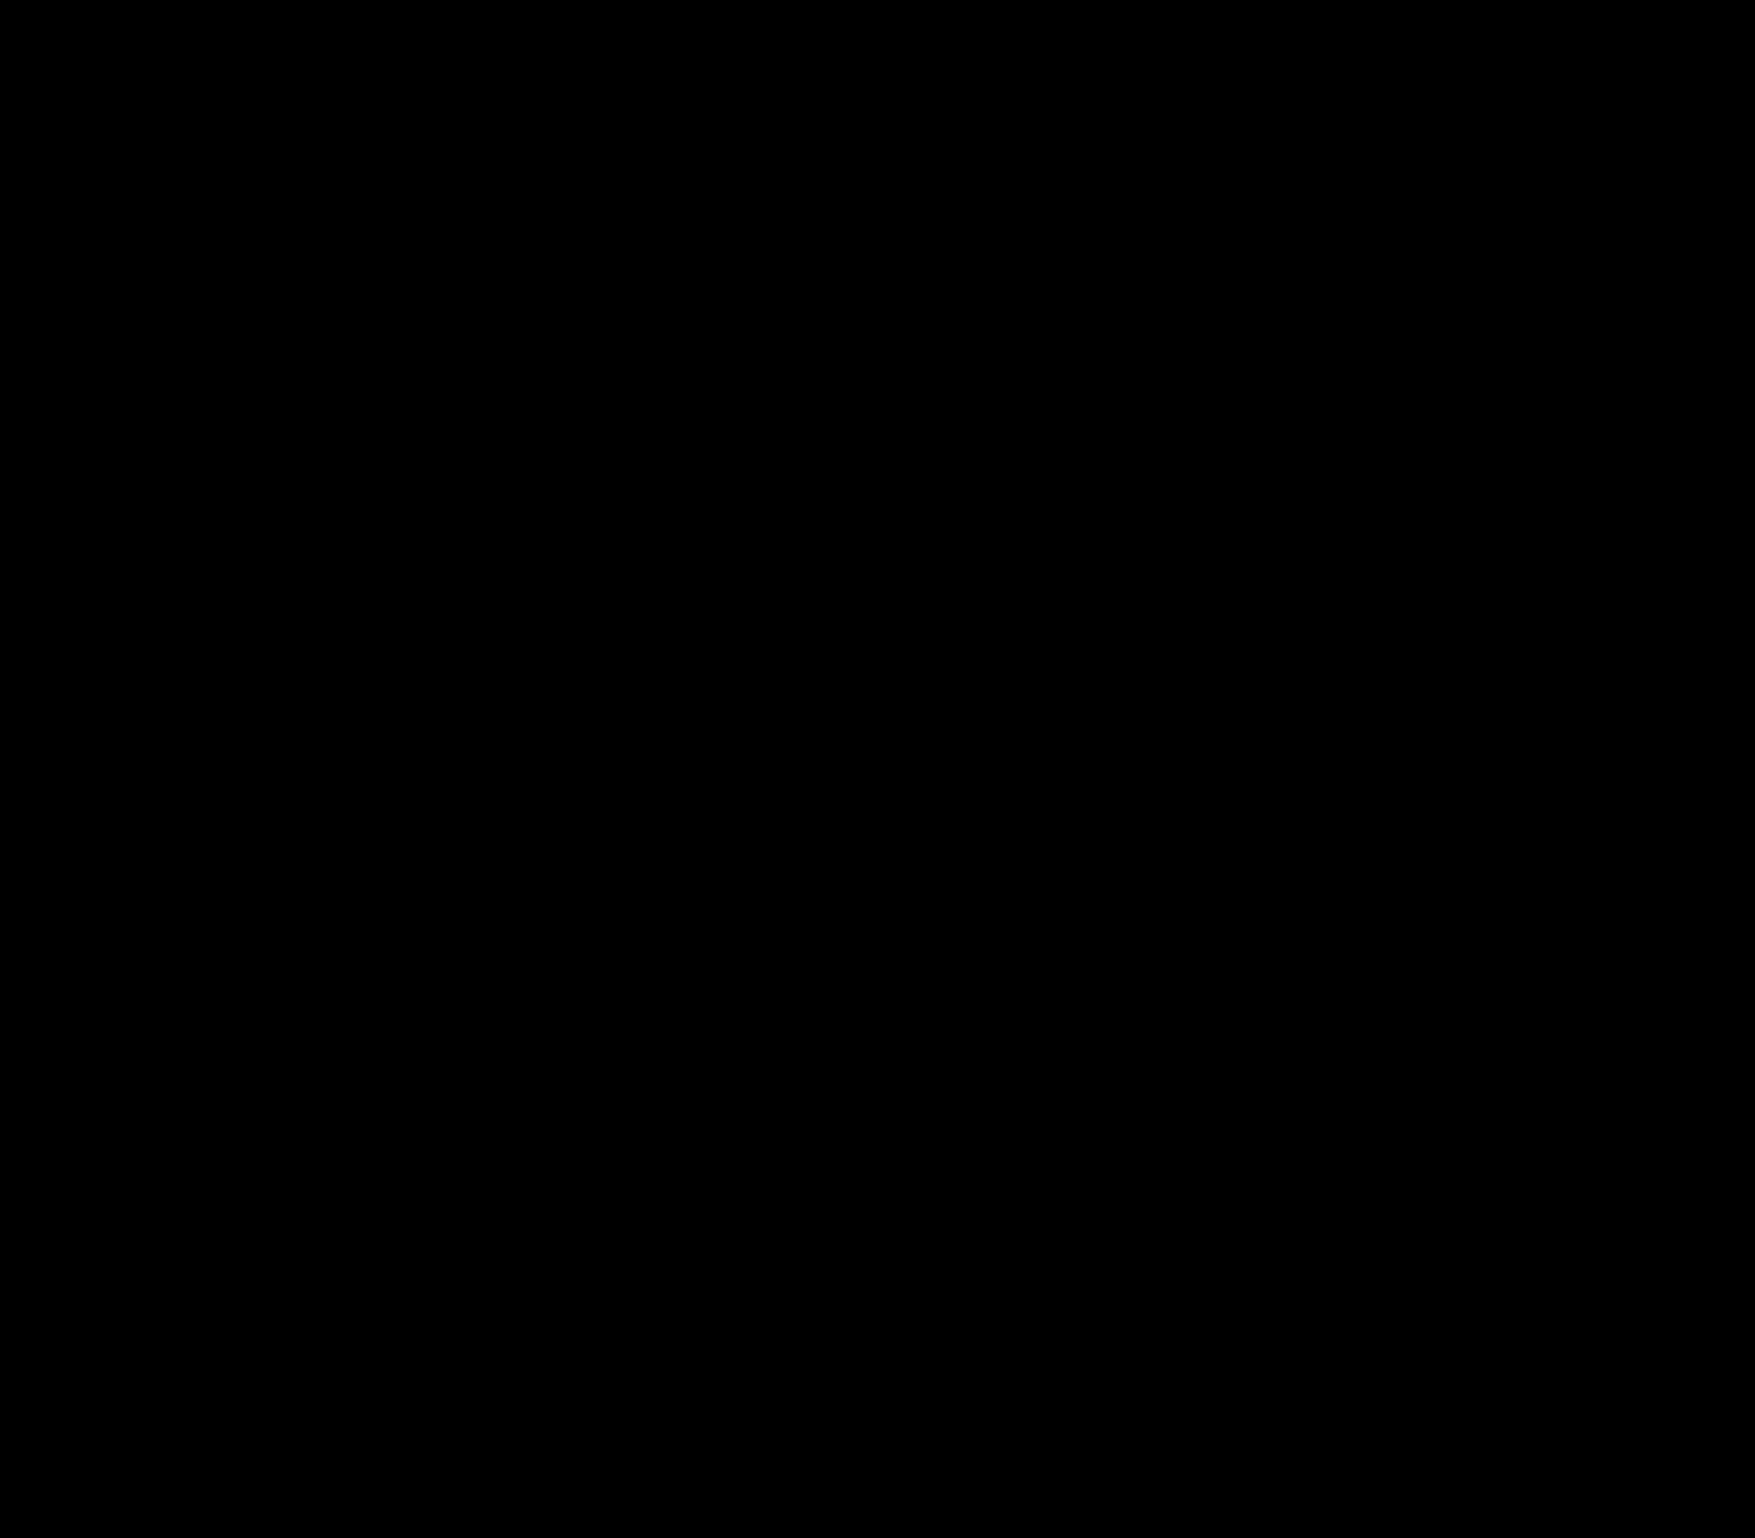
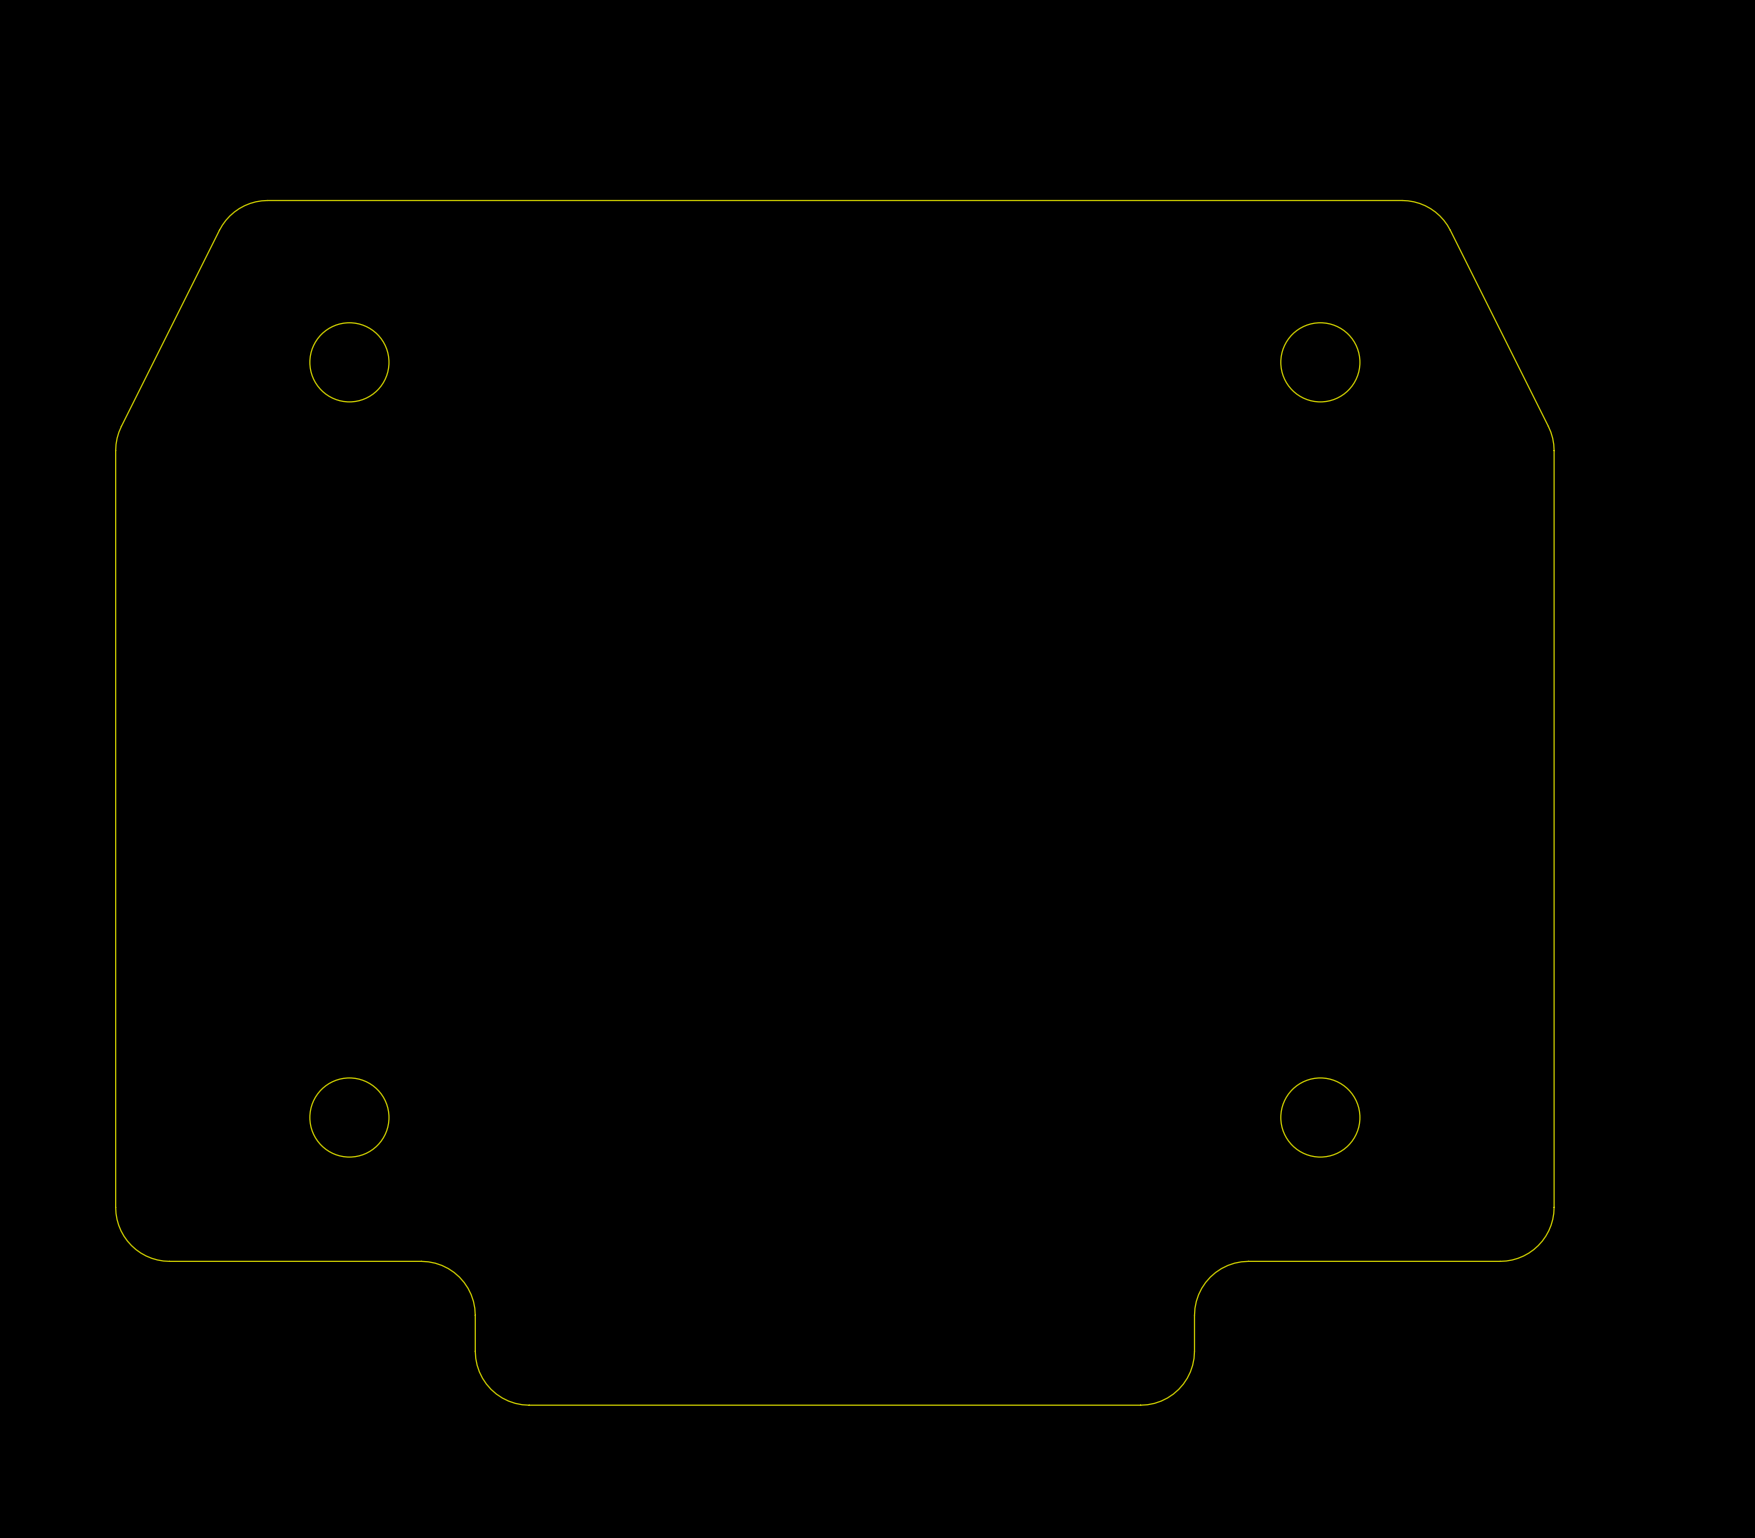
board edge: none -> (267, 200) (1402, 200) (1419, 203) (1435, 211) (1450, 230) (1548, 426) (1553, 444) (1554, 1207) (1551, 1225) (1542, 1241) (1523, 1256) (1506, 1261) (1248, 1261) (1227, 1265) (1210, 1277) (1198, 1294) (1194, 1308) (1194, 1358) (1187, 1378) (1178, 1389) (1167, 1397) (1154, 1403) (1140, 1405) (522, 1404) (508, 1401) (496, 1394) (482, 1378) (475, 1358) (474, 1308) (471, 1294) (459, 1277) (441, 1265) (421, 1261) (169, 1261) (151, 1258) (135, 1249) (121, 1230) (115, 1207) (116, 444) (121, 426) (222, 225) (229, 215) (244, 205) (267, 200)
round board edge: none -> [309, 322, 390, 403]
round board edge: none -> [1280, 322, 1361, 403]
round board edge: none -> [309, 1077, 390, 1158]
round board edge: none -> [1280, 1077, 1361, 1158]

